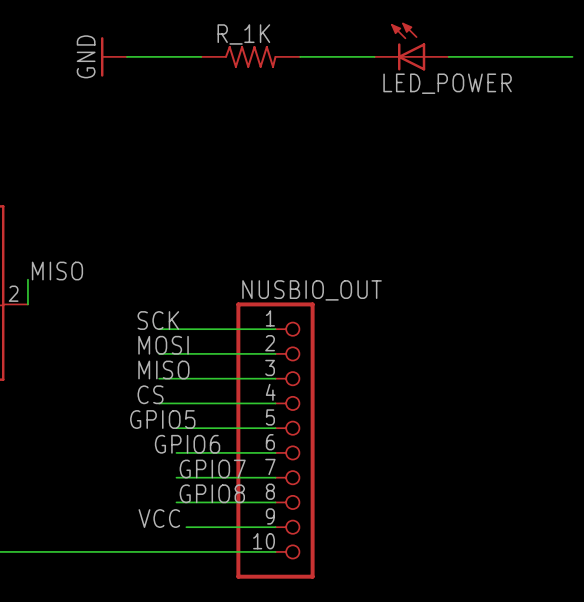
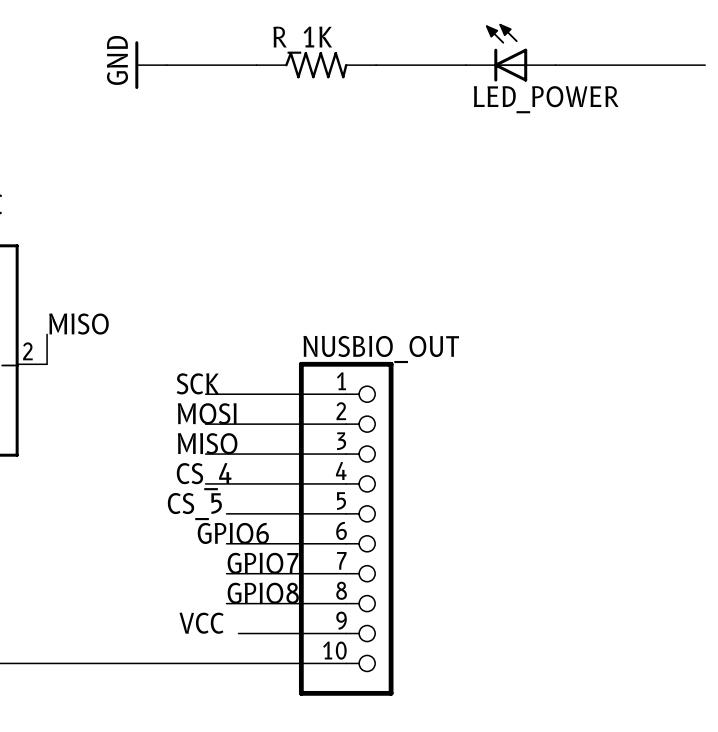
label: CS (150, 394) -> CS_4 (204, 476)
label: GPIO5 (162, 419) -> CS_5 (194, 506)

